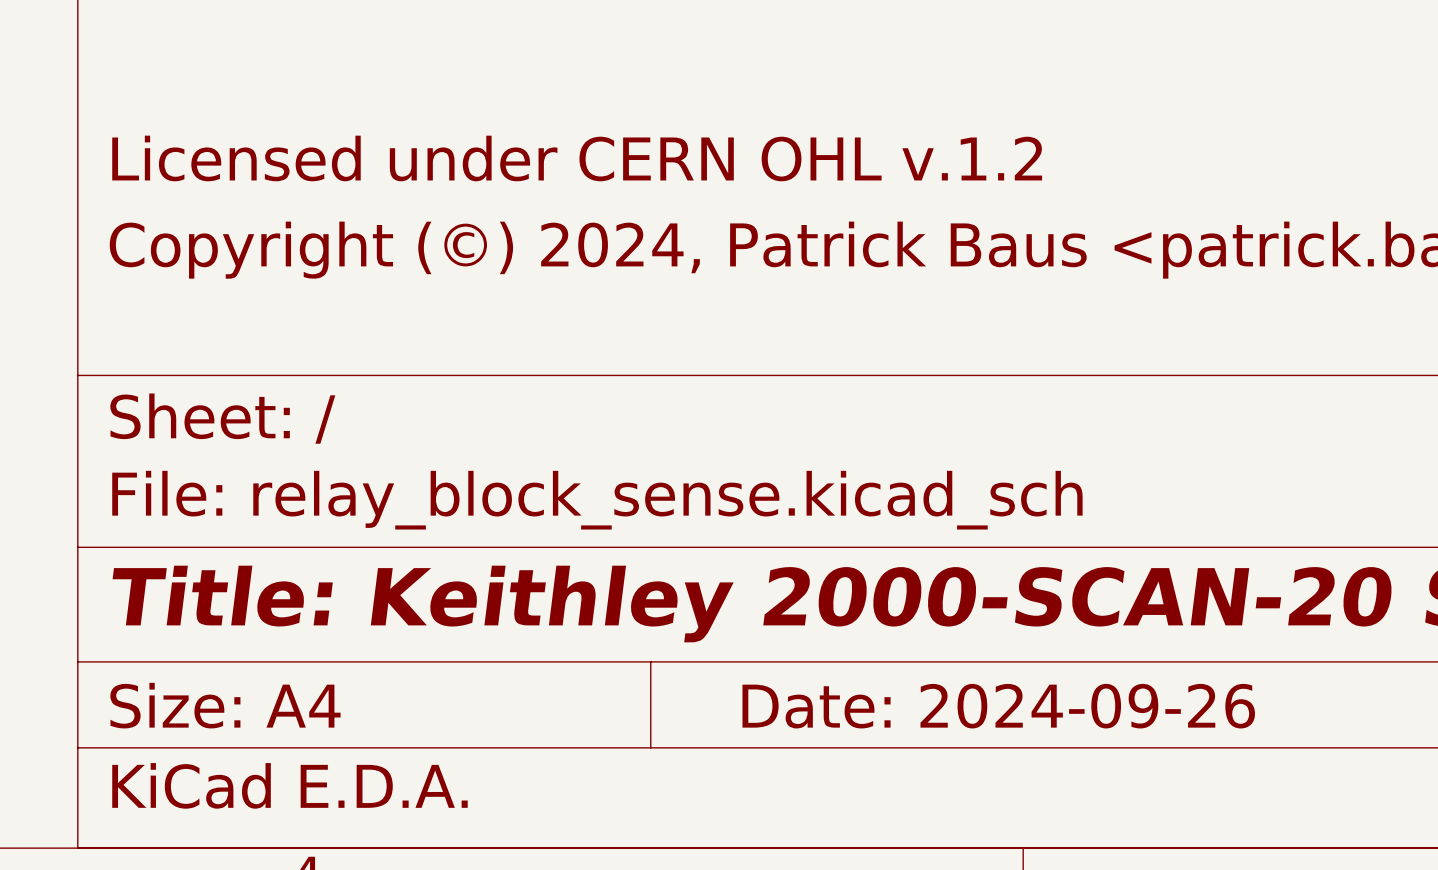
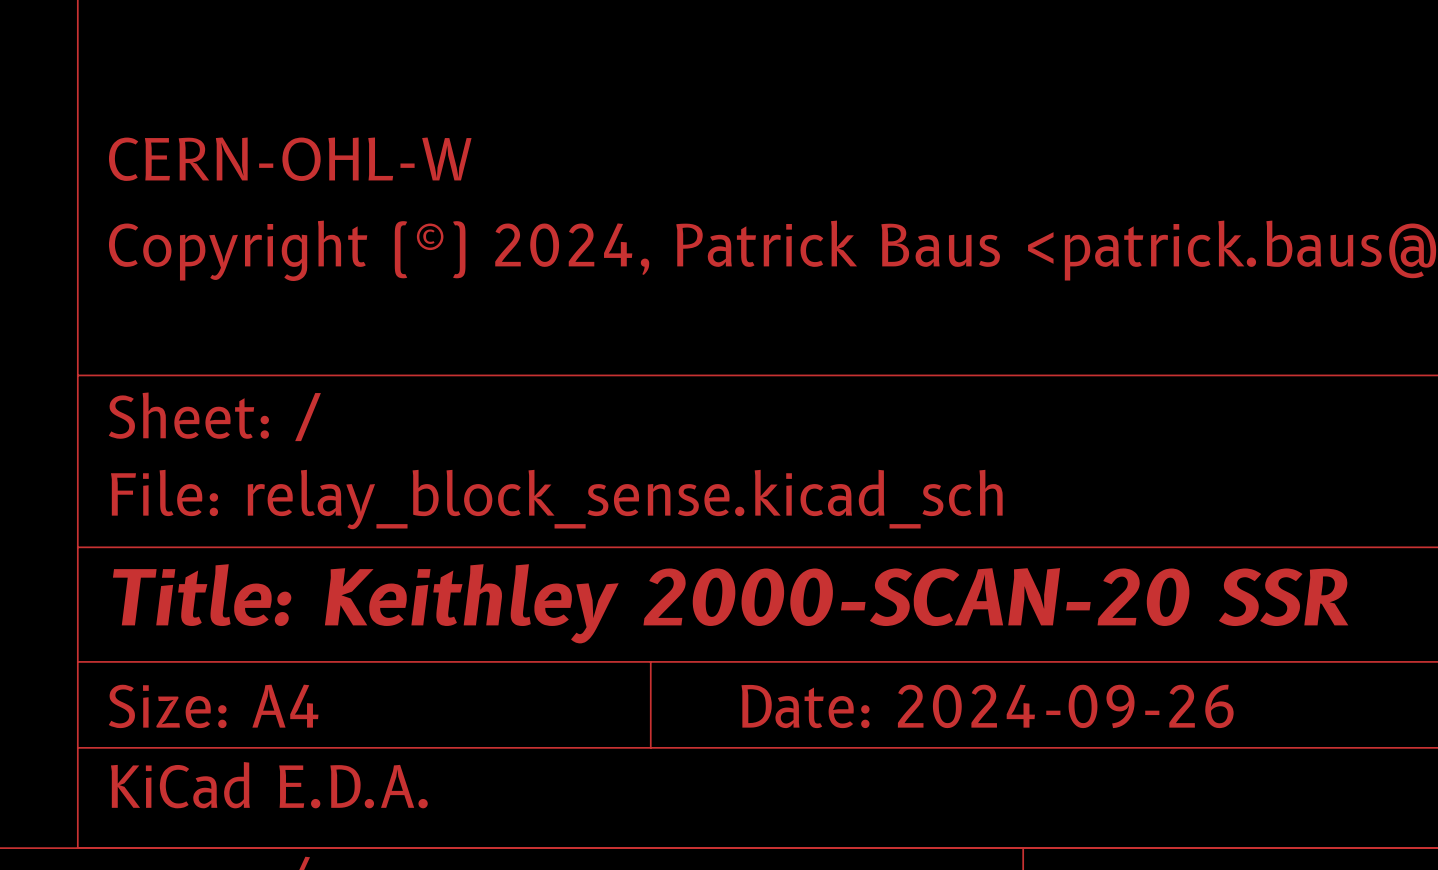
title block: Licensed under CERN OHL v.1.2 (577, 158) -> CERN-OHL-W (290, 159)

